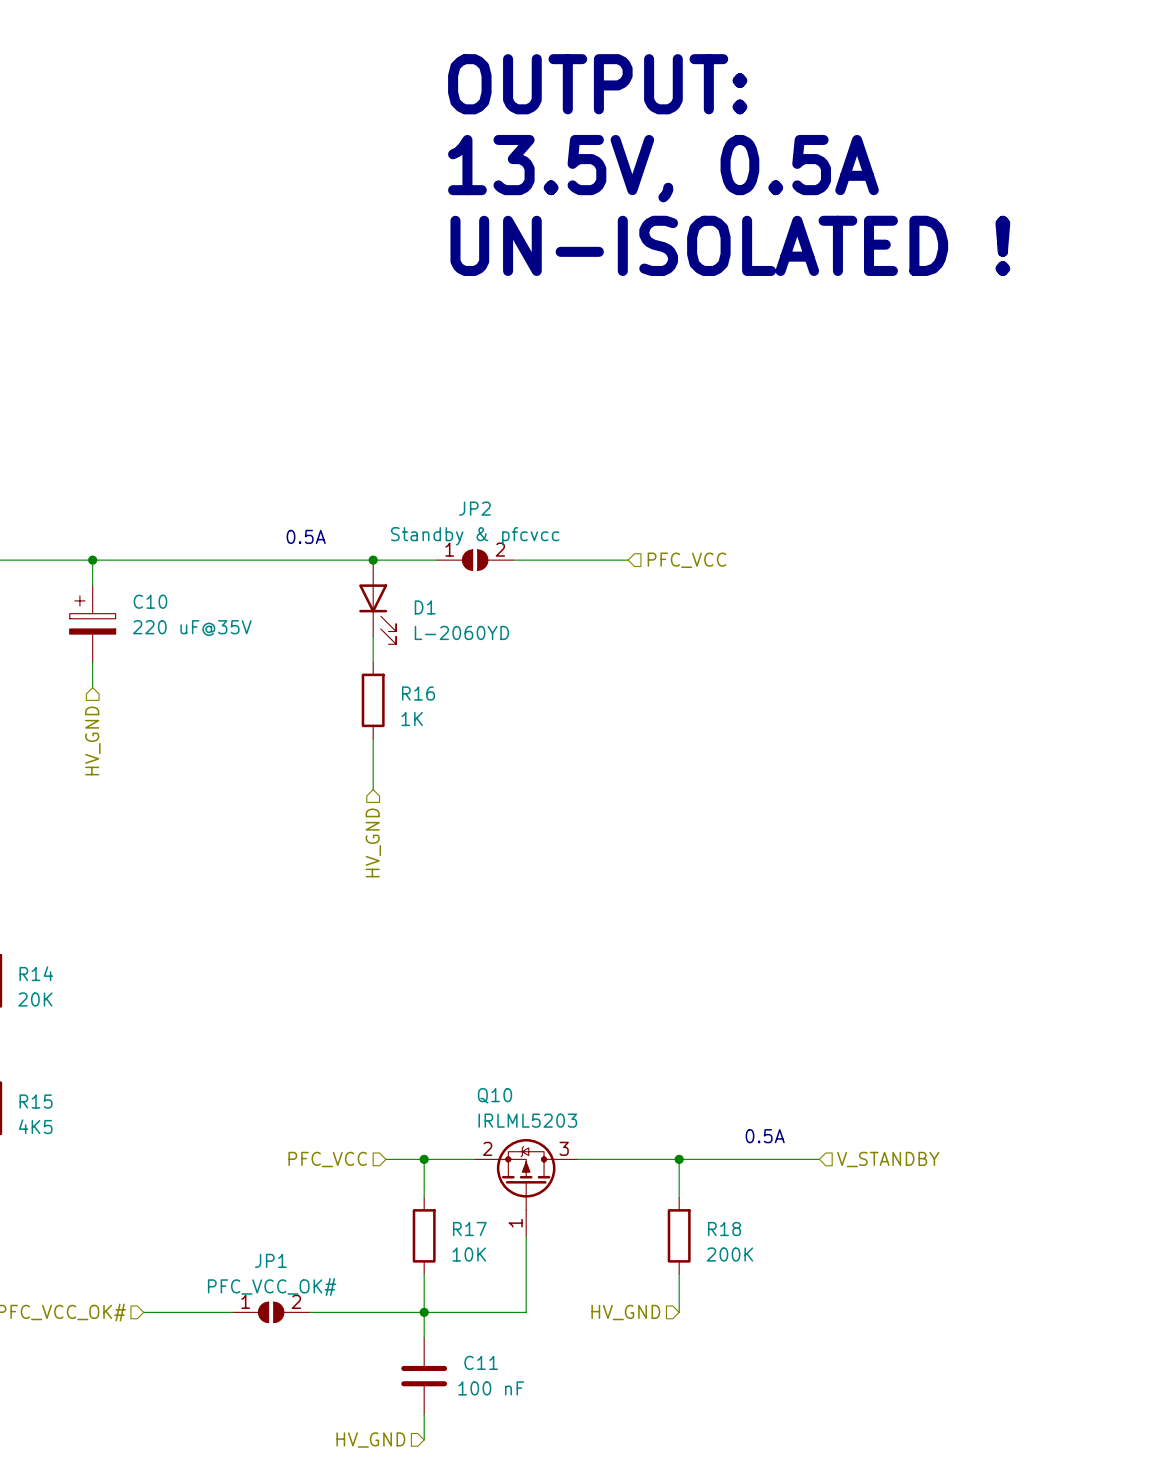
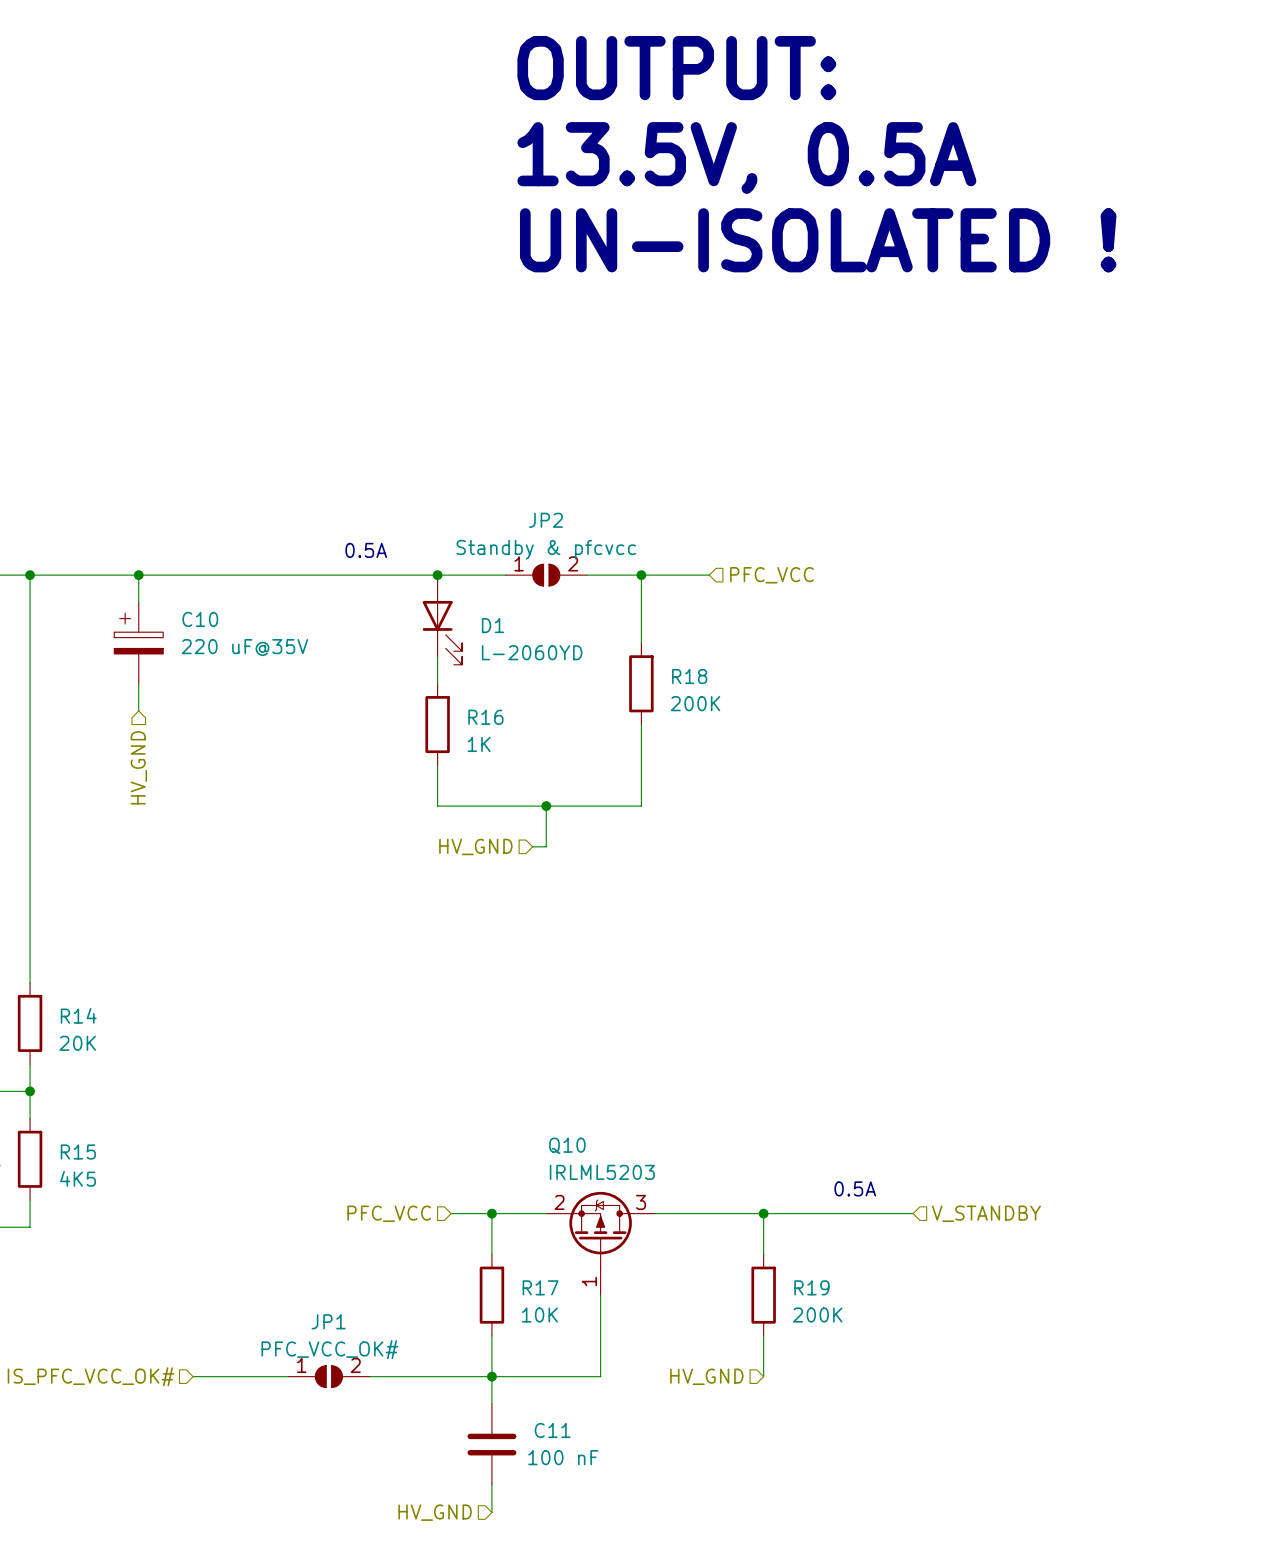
wire: none -> (641, 575) (641, 643)
junction: none -> (641, 575)
R18: none -> 200K (641, 683)
wire: (373, 776) (373, 789) -> (437, 806) (641, 806) (641, 724)
wire: none -> (546, 806) (546, 846) (532, 846)
junction: none -> (546, 806)
hierarchical label rotation: 0° (373, 842) -> 90° clockwise (475, 846)
R18 name: R18 (724, 1229) -> R19 (811, 1287)

